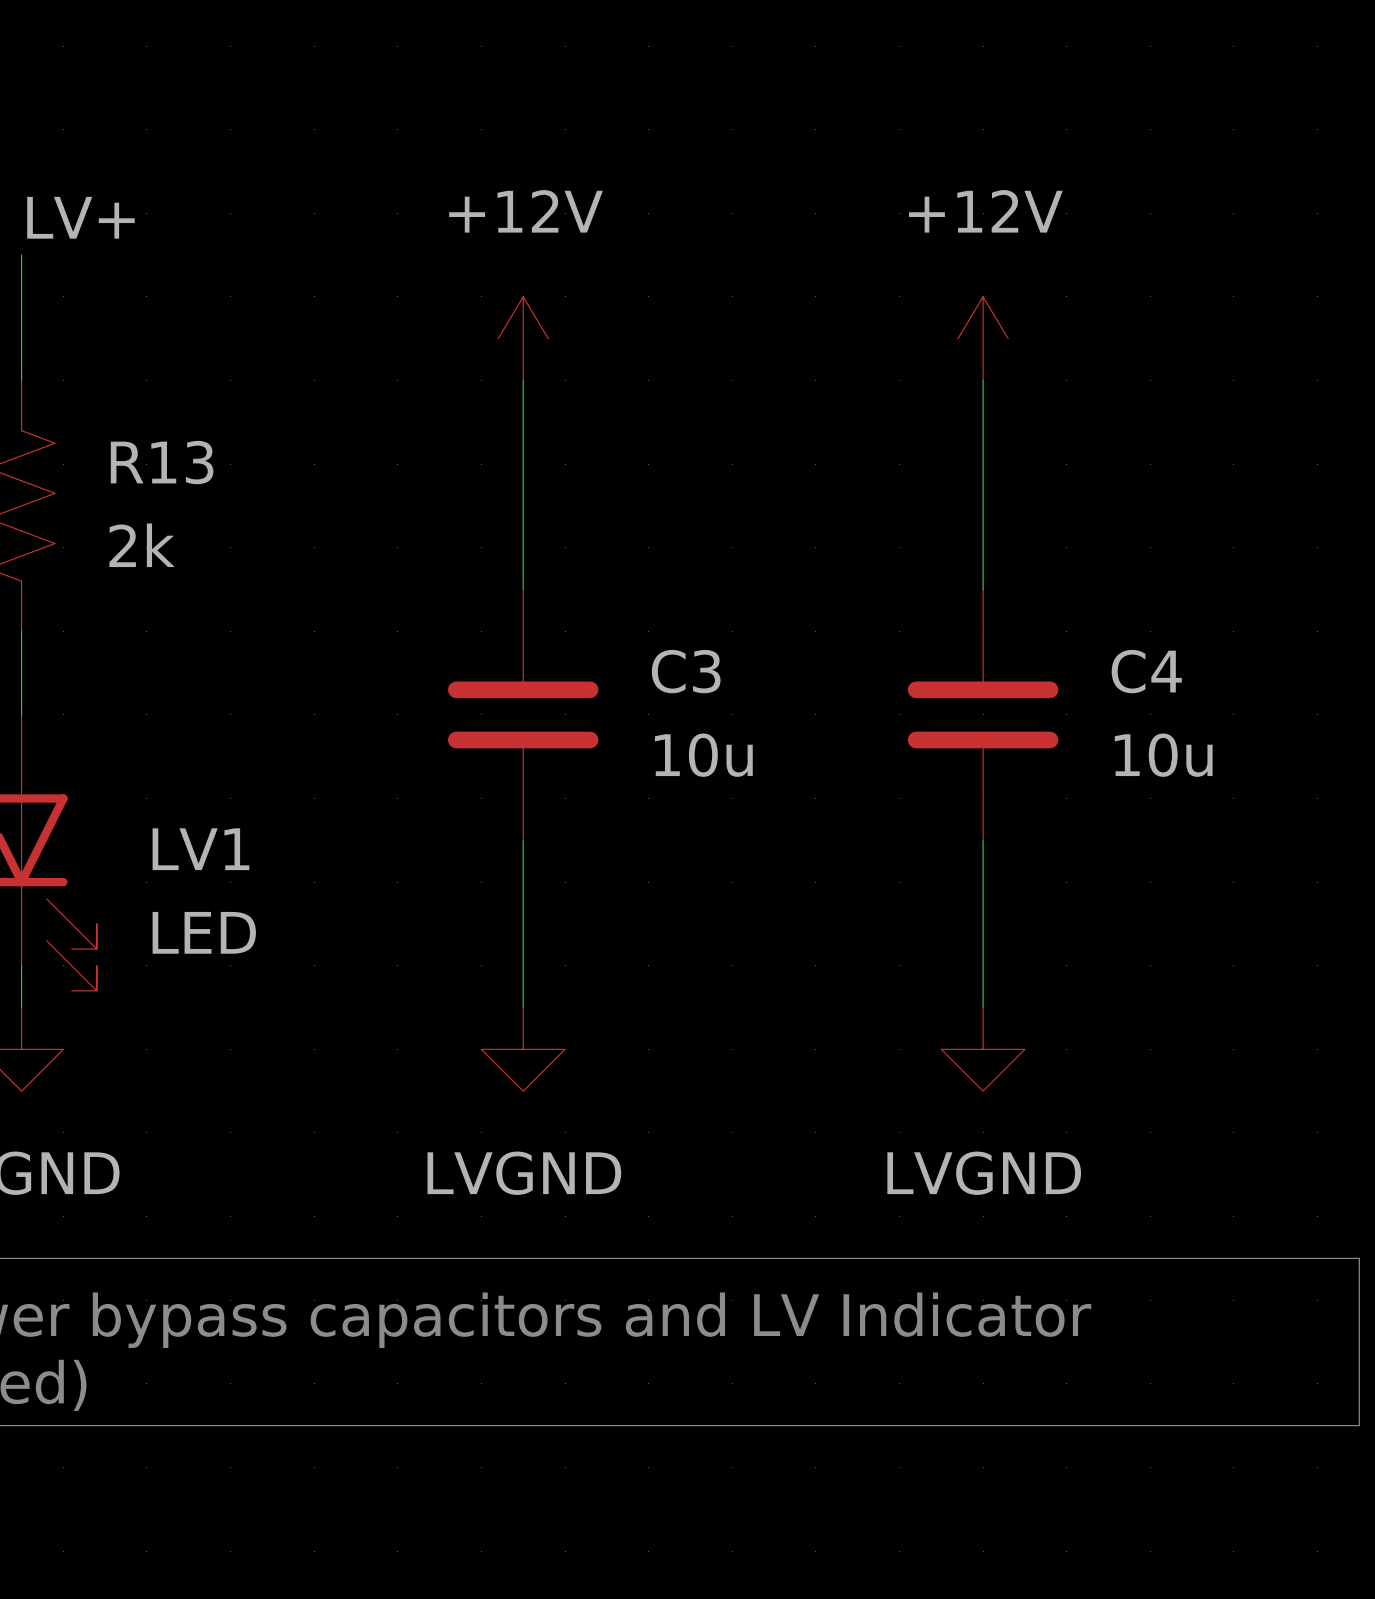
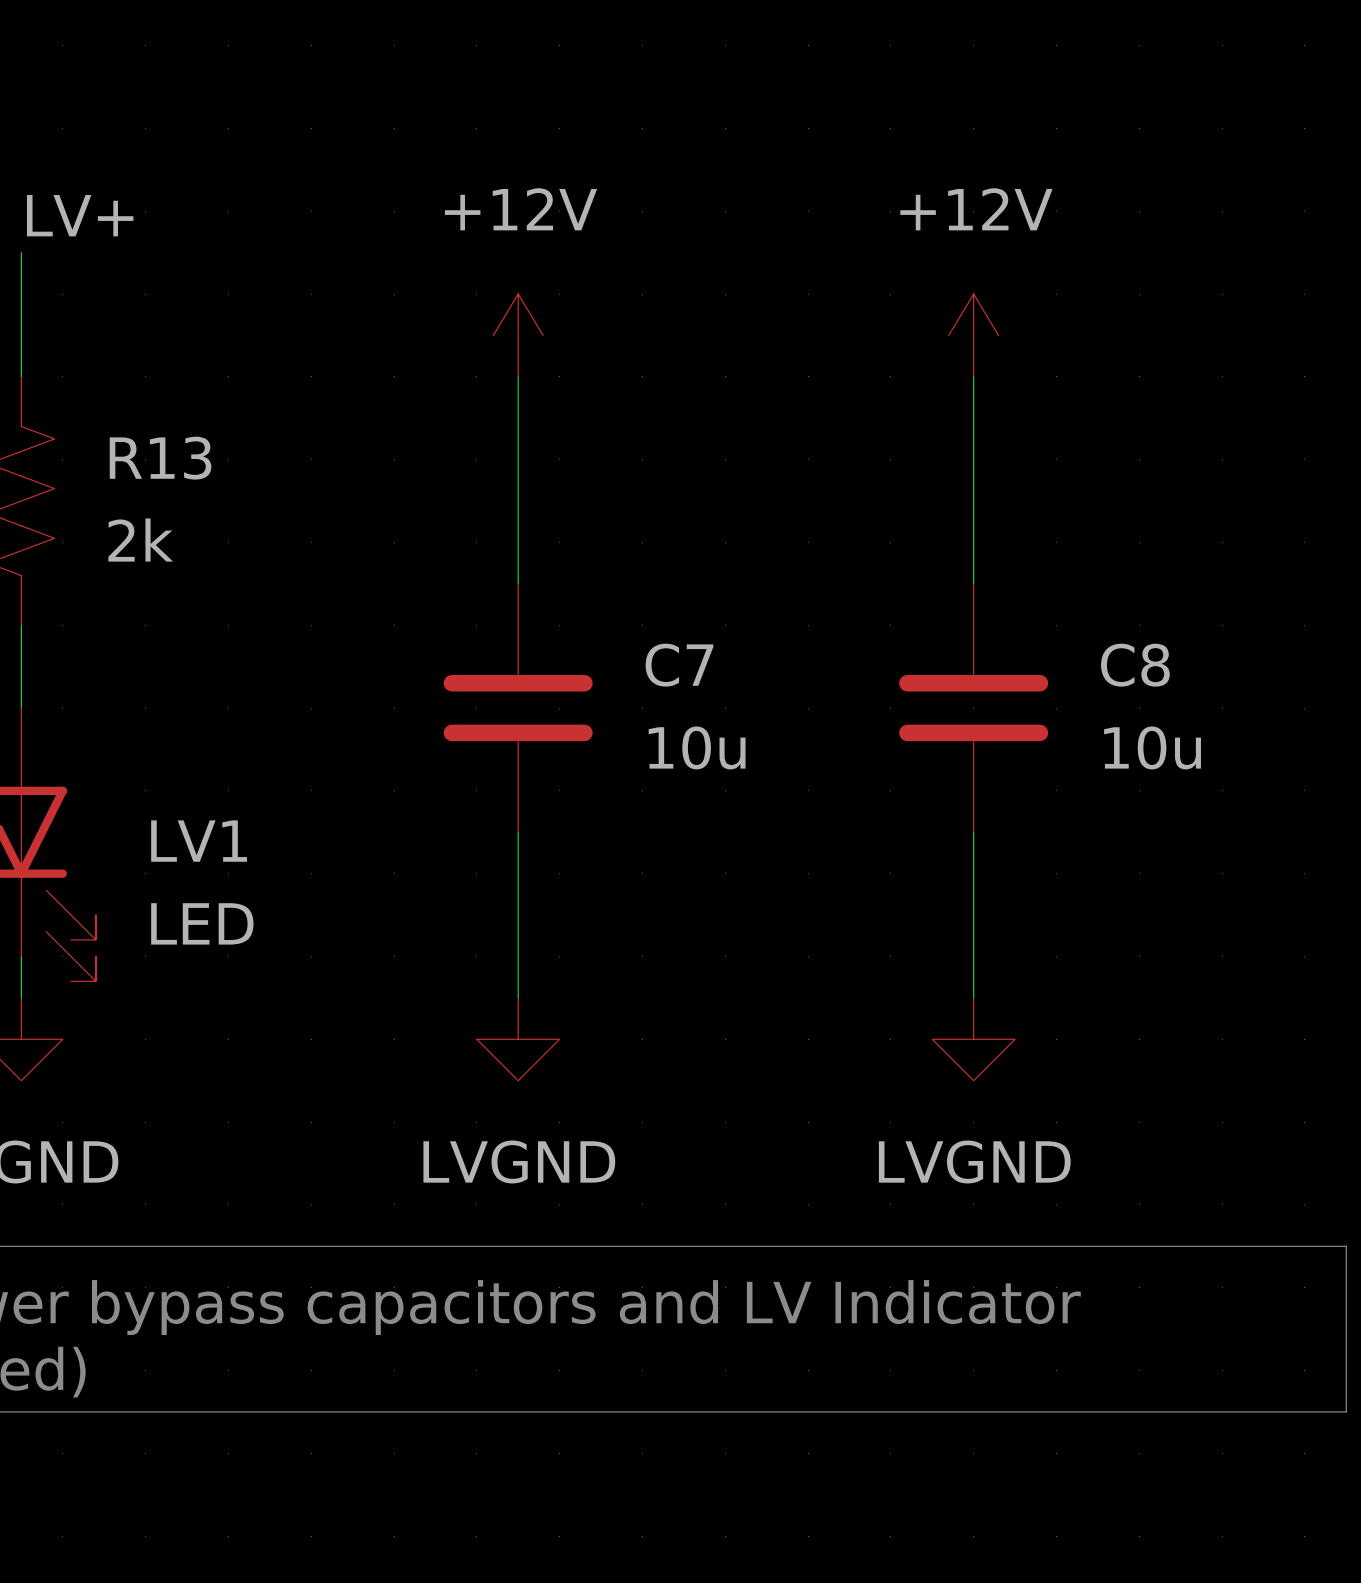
C3 name: C3 (686, 671) -> C7 (679, 665)
C4 name: C4 (1146, 671) -> C8 (1135, 665)

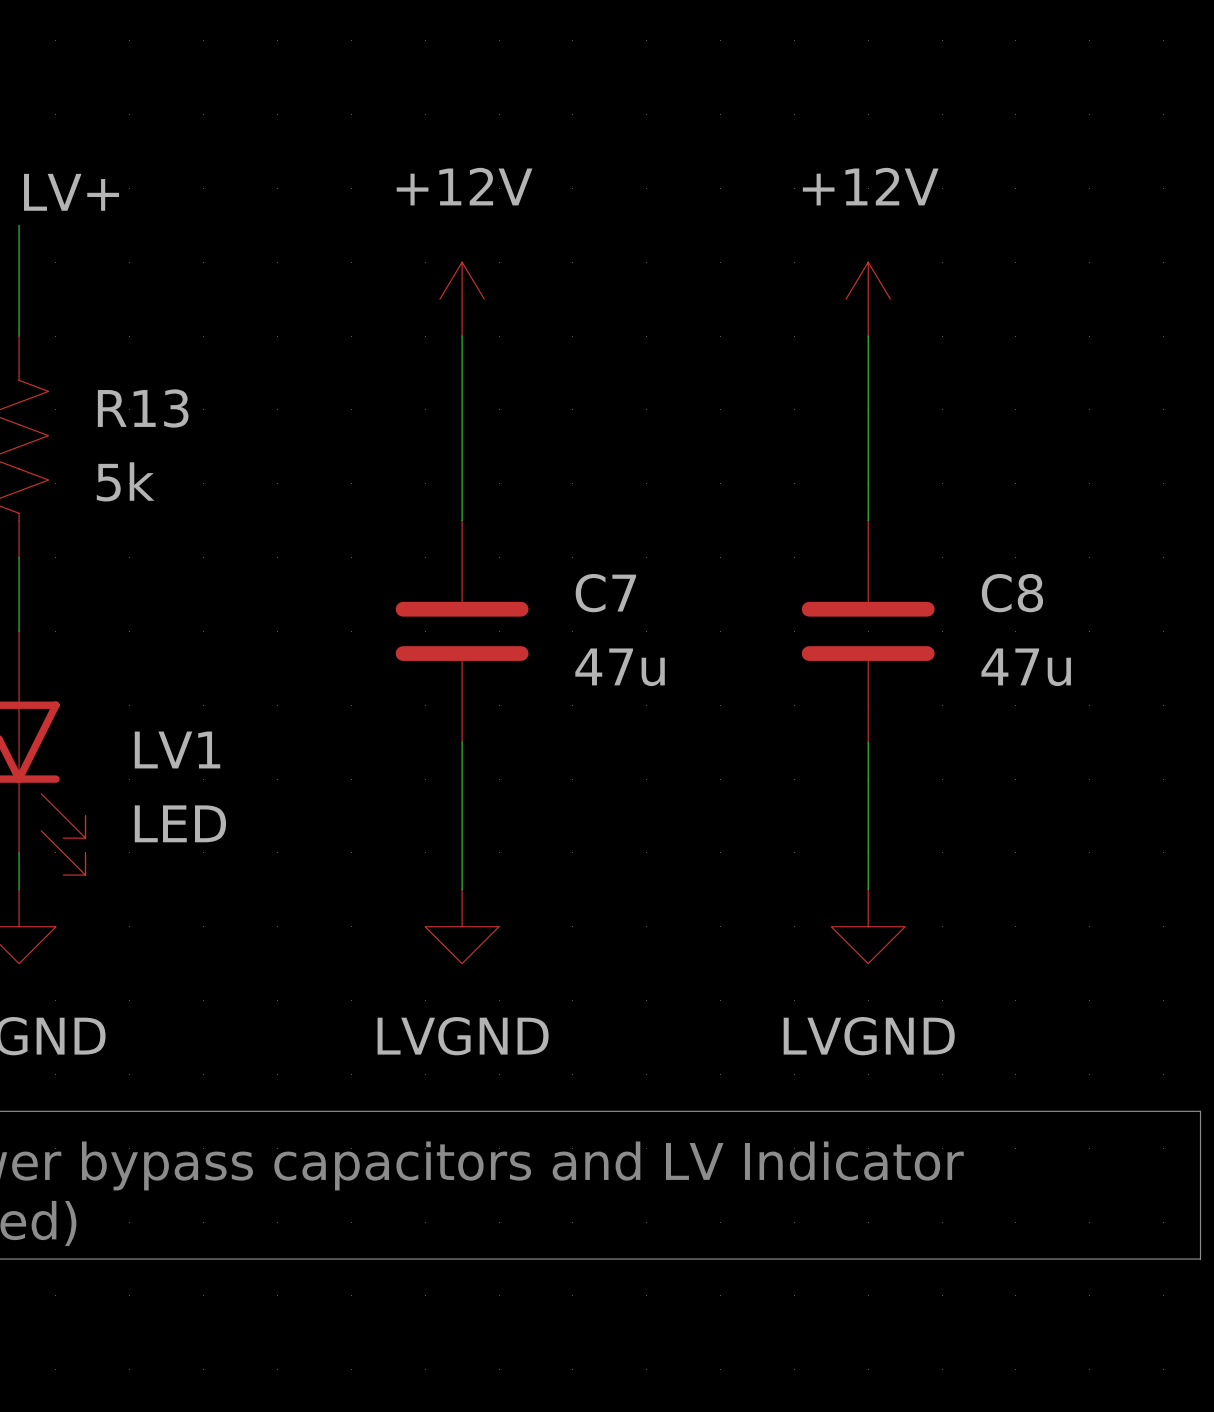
R13 value: 2k (140, 540) -> 5k (125, 481)
C7 value: 10u (697, 747) -> 47u (620, 667)
C8 value: 10u (1152, 747) -> 47u (1026, 667)

